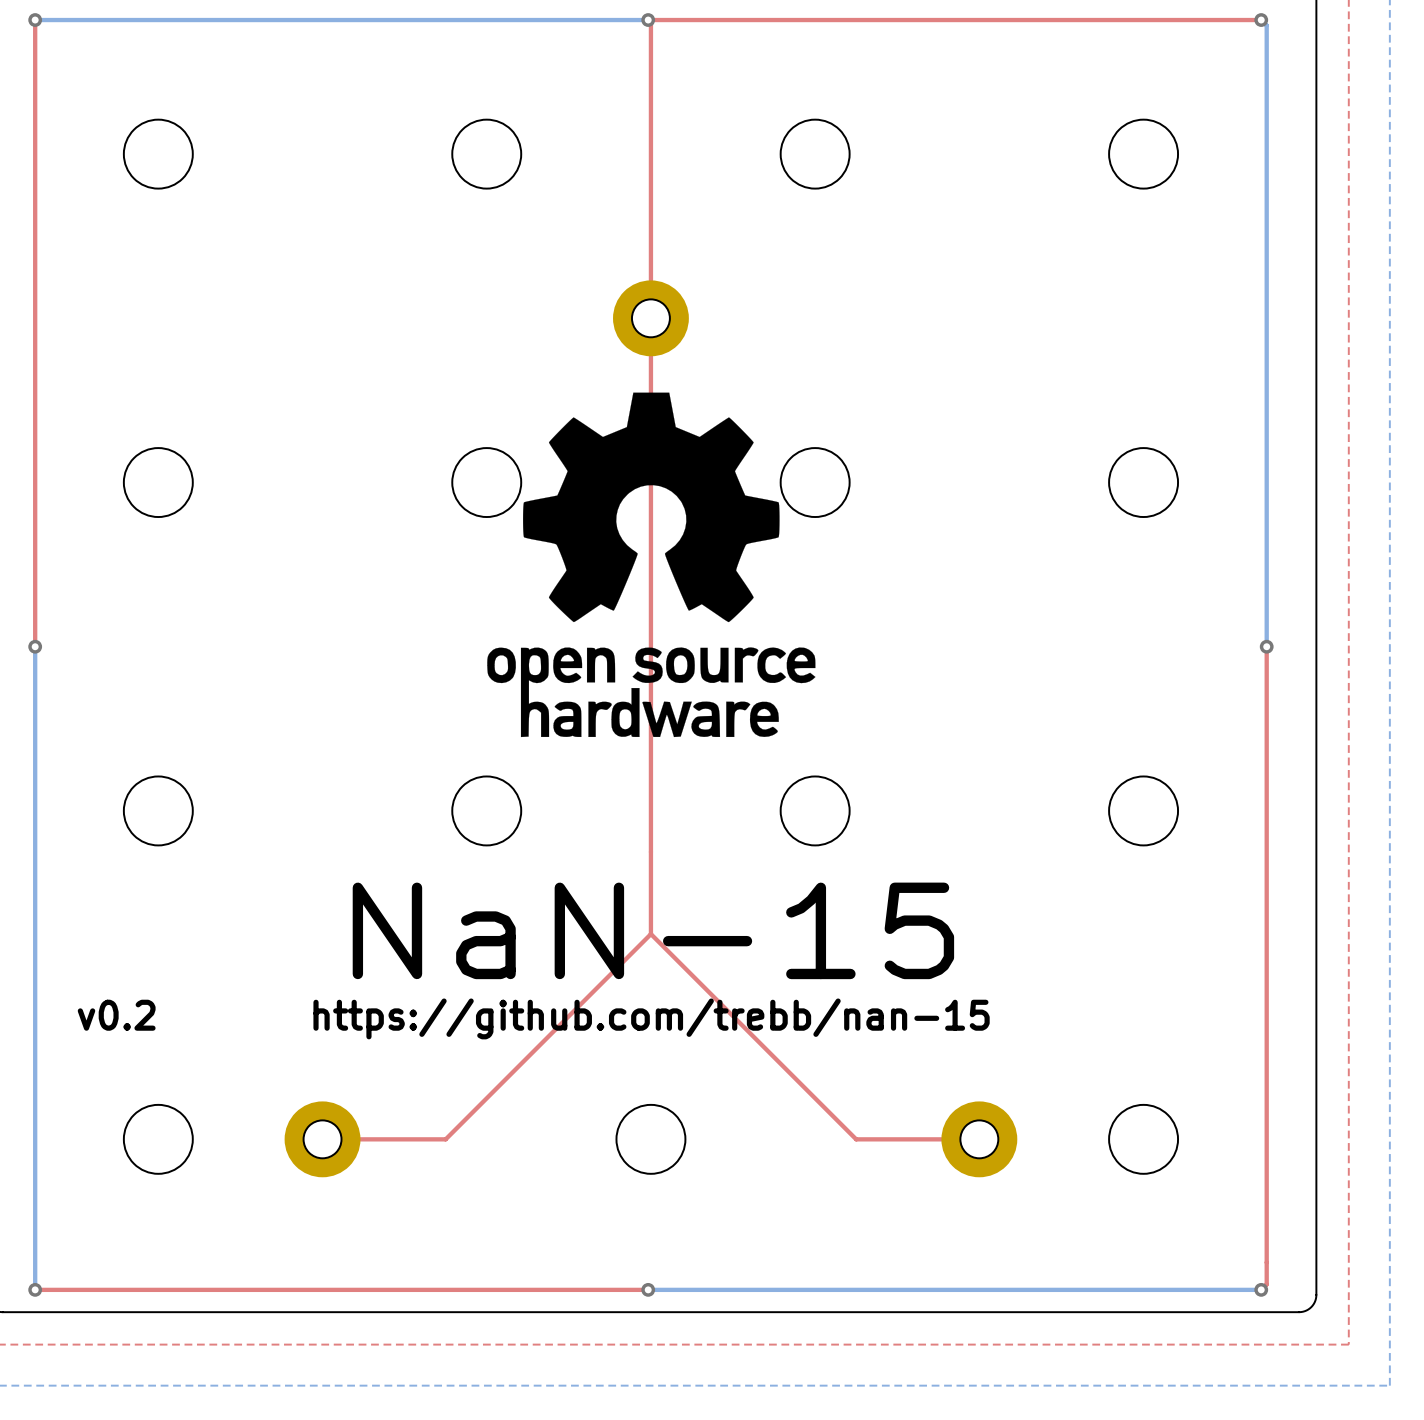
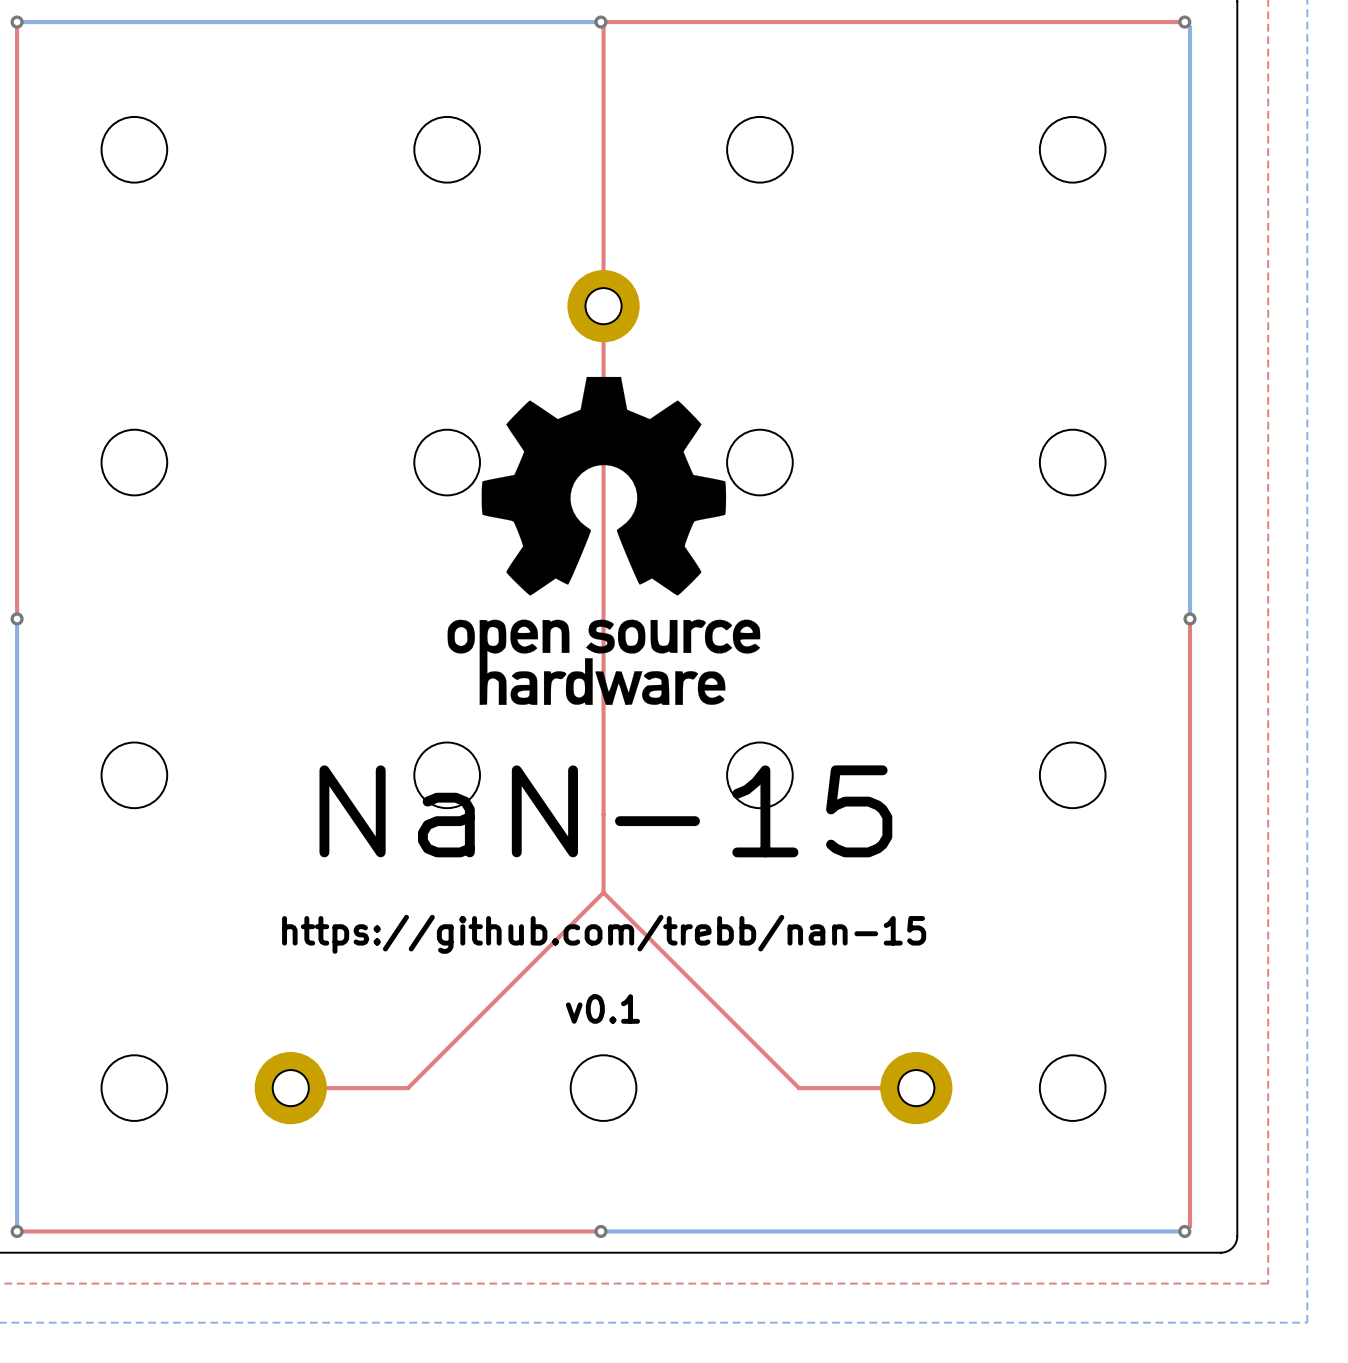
text position: NaN-15 (653, 930) -> NaN-15 (605, 811)
text: v0.2 (116, 1015) -> none
text position: https://github.com/trebb/nan-15 (651, 1018) -> https://github.com/trebb/nan-15 (604, 934)
text: none -> v0.1 (602, 1008)

